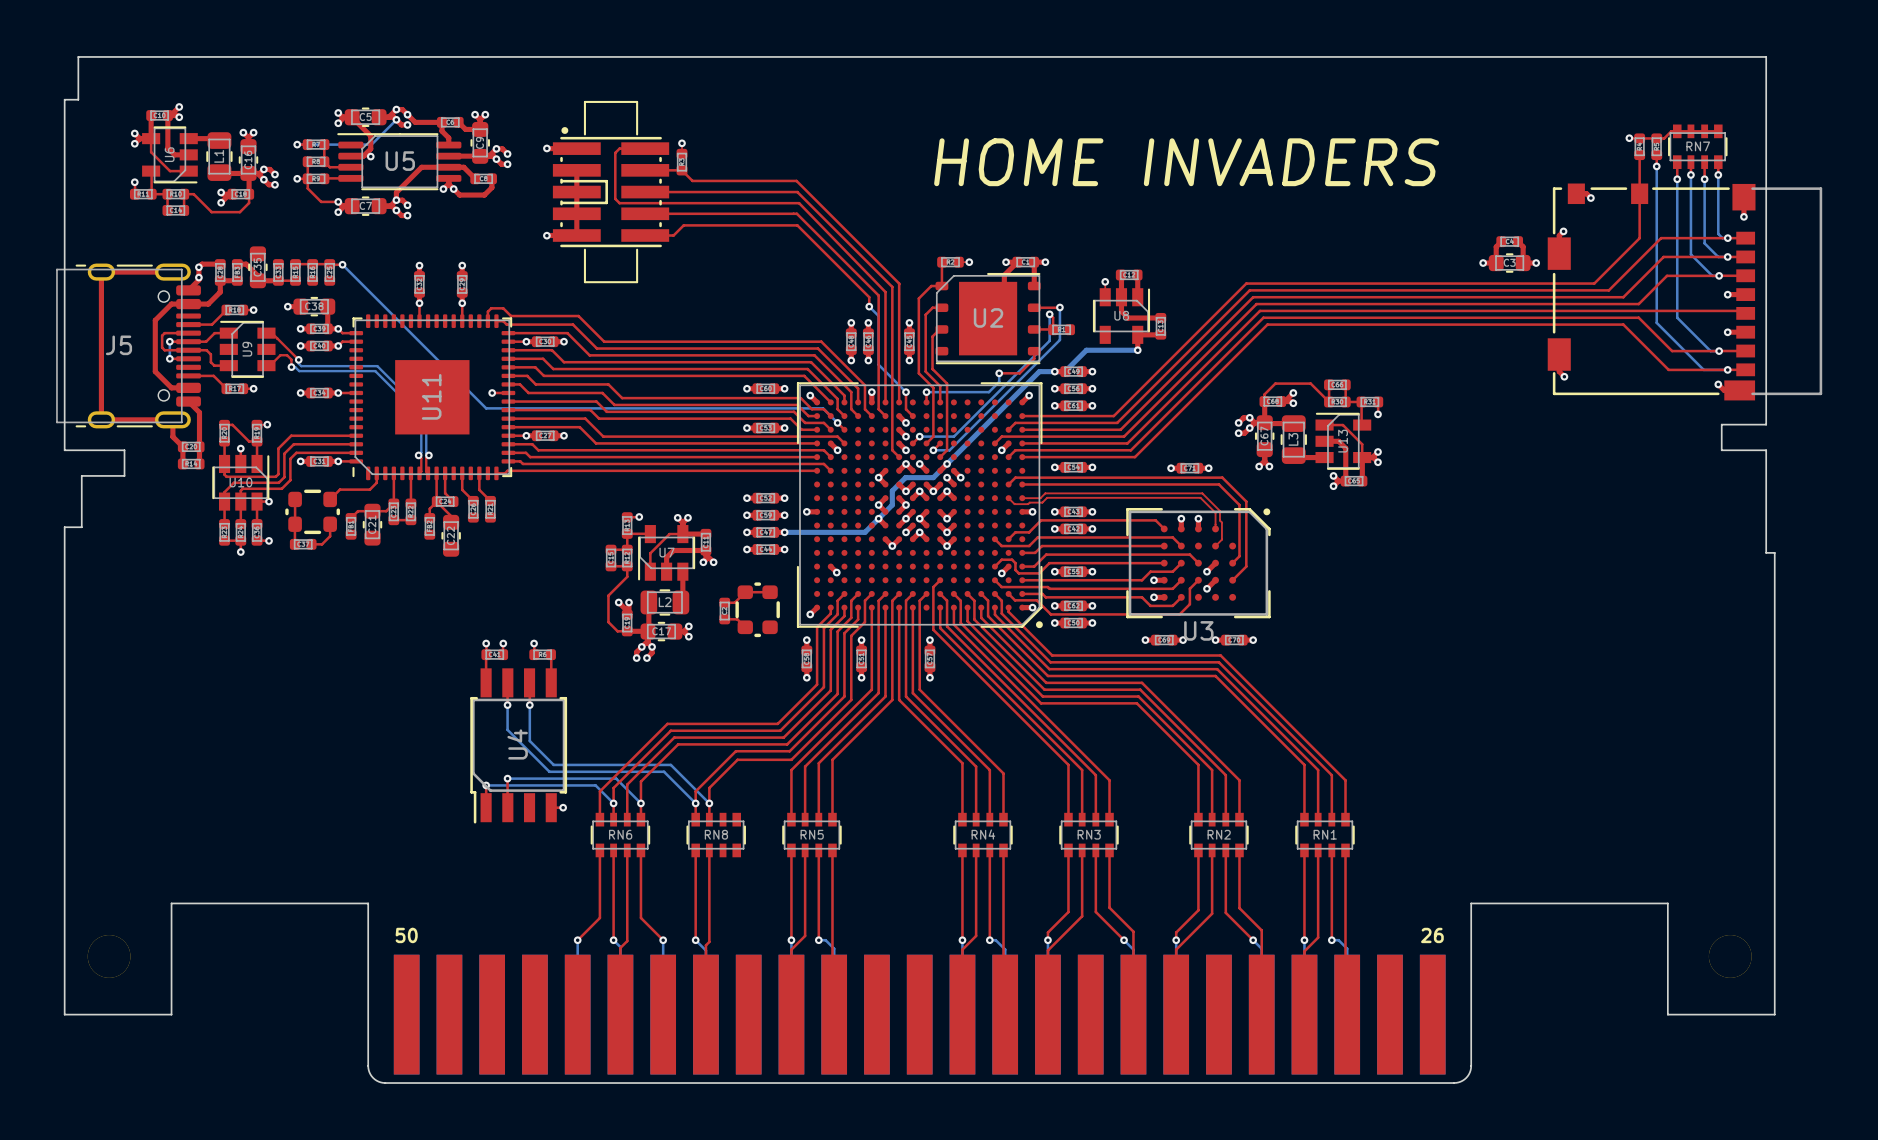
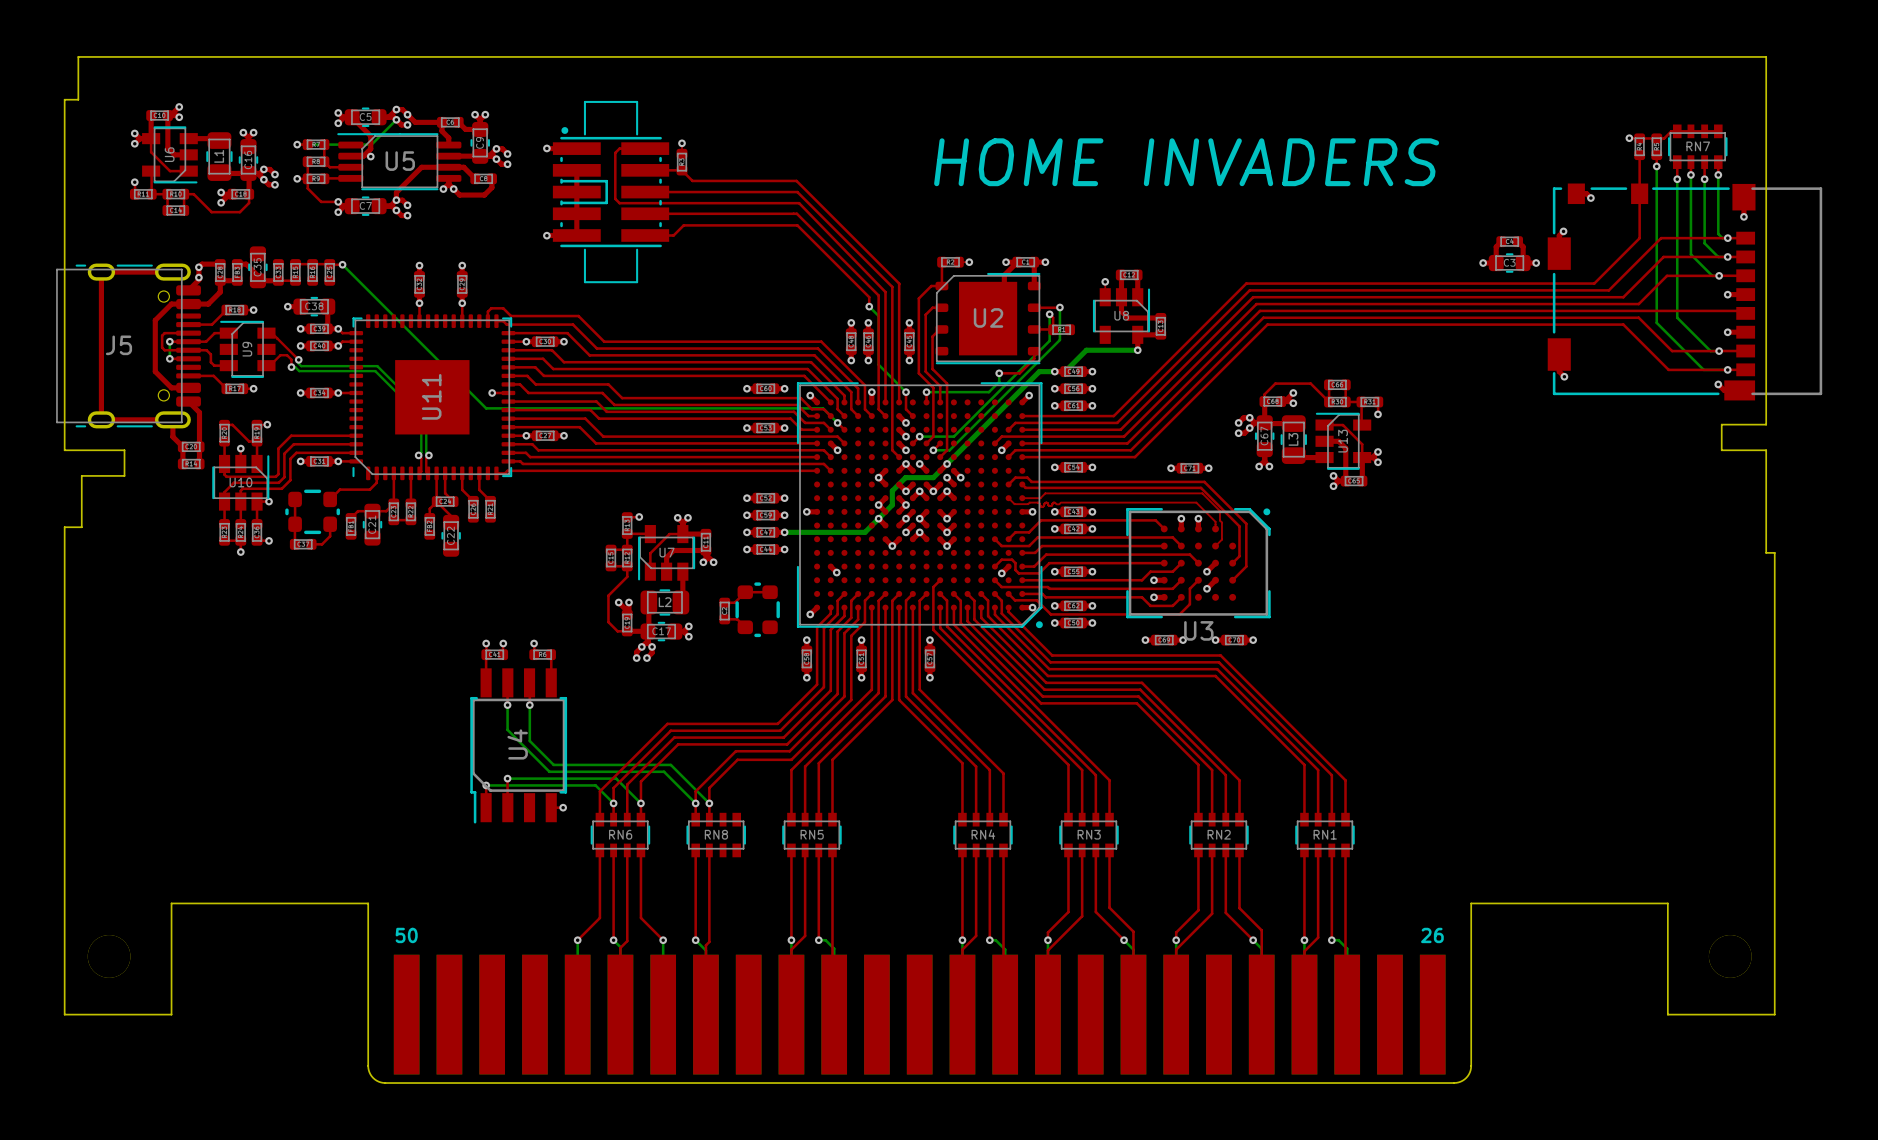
top track: (1027, 477) (1222, 477) (1246, 501) (1246, 523) -> (1027, 477) (1031, 481) (1204, 481) (1246, 523)
top track: (1022, 484) (1218, 484) (1239, 505) (1239, 526) -> (1022, 484) (1025, 487) (1201, 487) (1239, 526)
top track: (1037, 502) (1042, 502) (1047, 497) (1200, 497) (1215, 512) (1215, 521) -> (1060, 502) (1196, 502) (1215, 521)
top track: none -> (1037, 502) (1042, 506) (1045, 502) (1050, 506) (1054, 502)
top track: none -> (1055, 503) (1055, 503)
top track: none -> (1060, 503) (1060, 503)
top track: none -> (1056, 504) (1059, 504)

